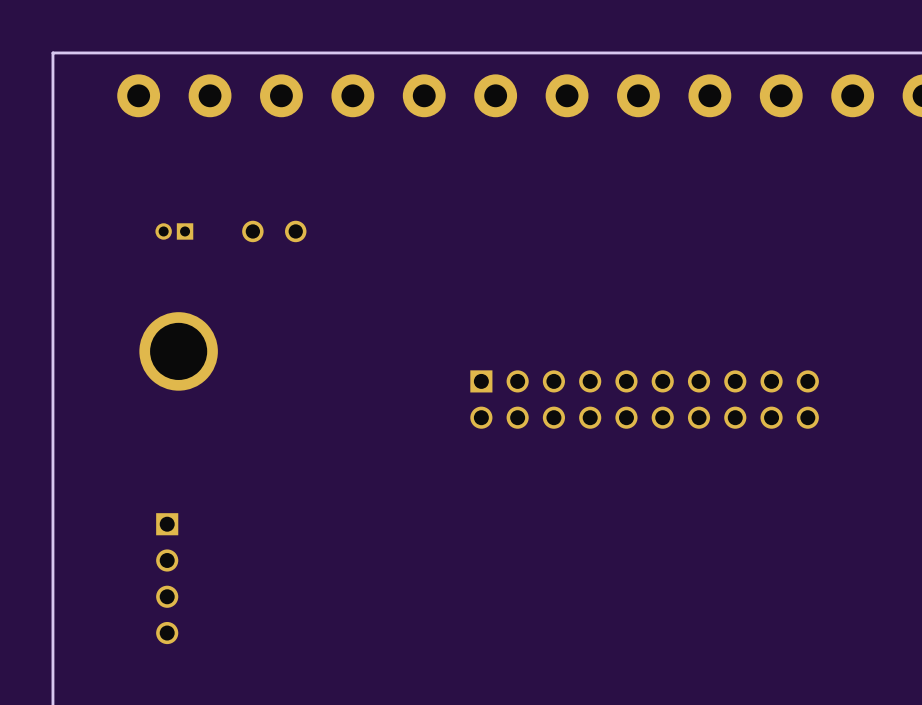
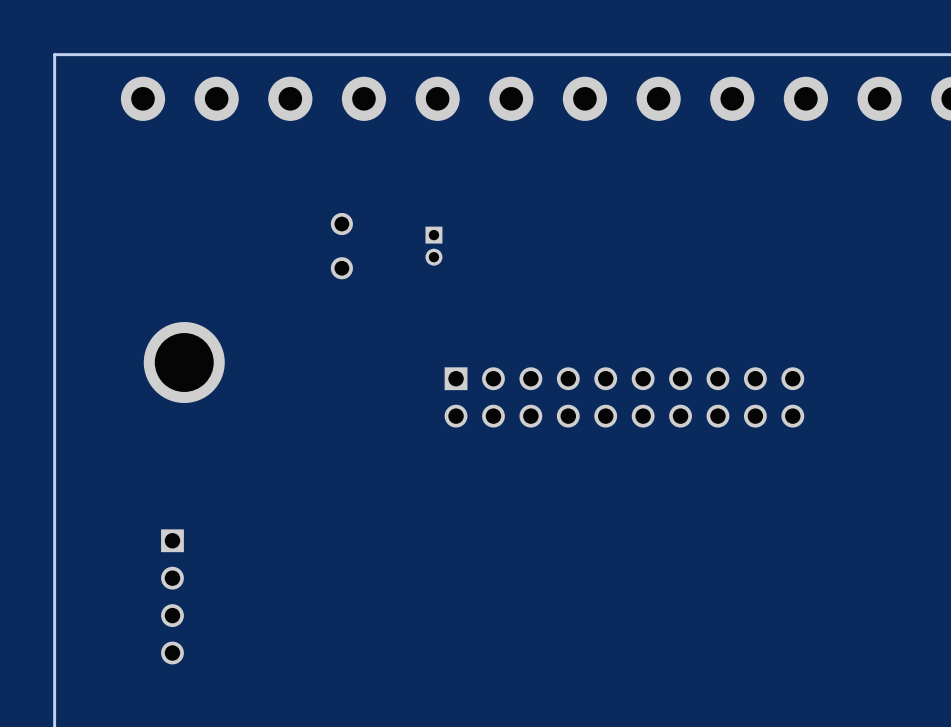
part rotation: 0° (174, 231) -> 90° counterclockwise (433, 246)
part position: (174, 231) -> (433, 246)
part rotation: 0° (274, 231) -> 90° clockwise (341, 246)
part position: (274, 231) -> (341, 246)
part position: (644, 399) -> (624, 397)

